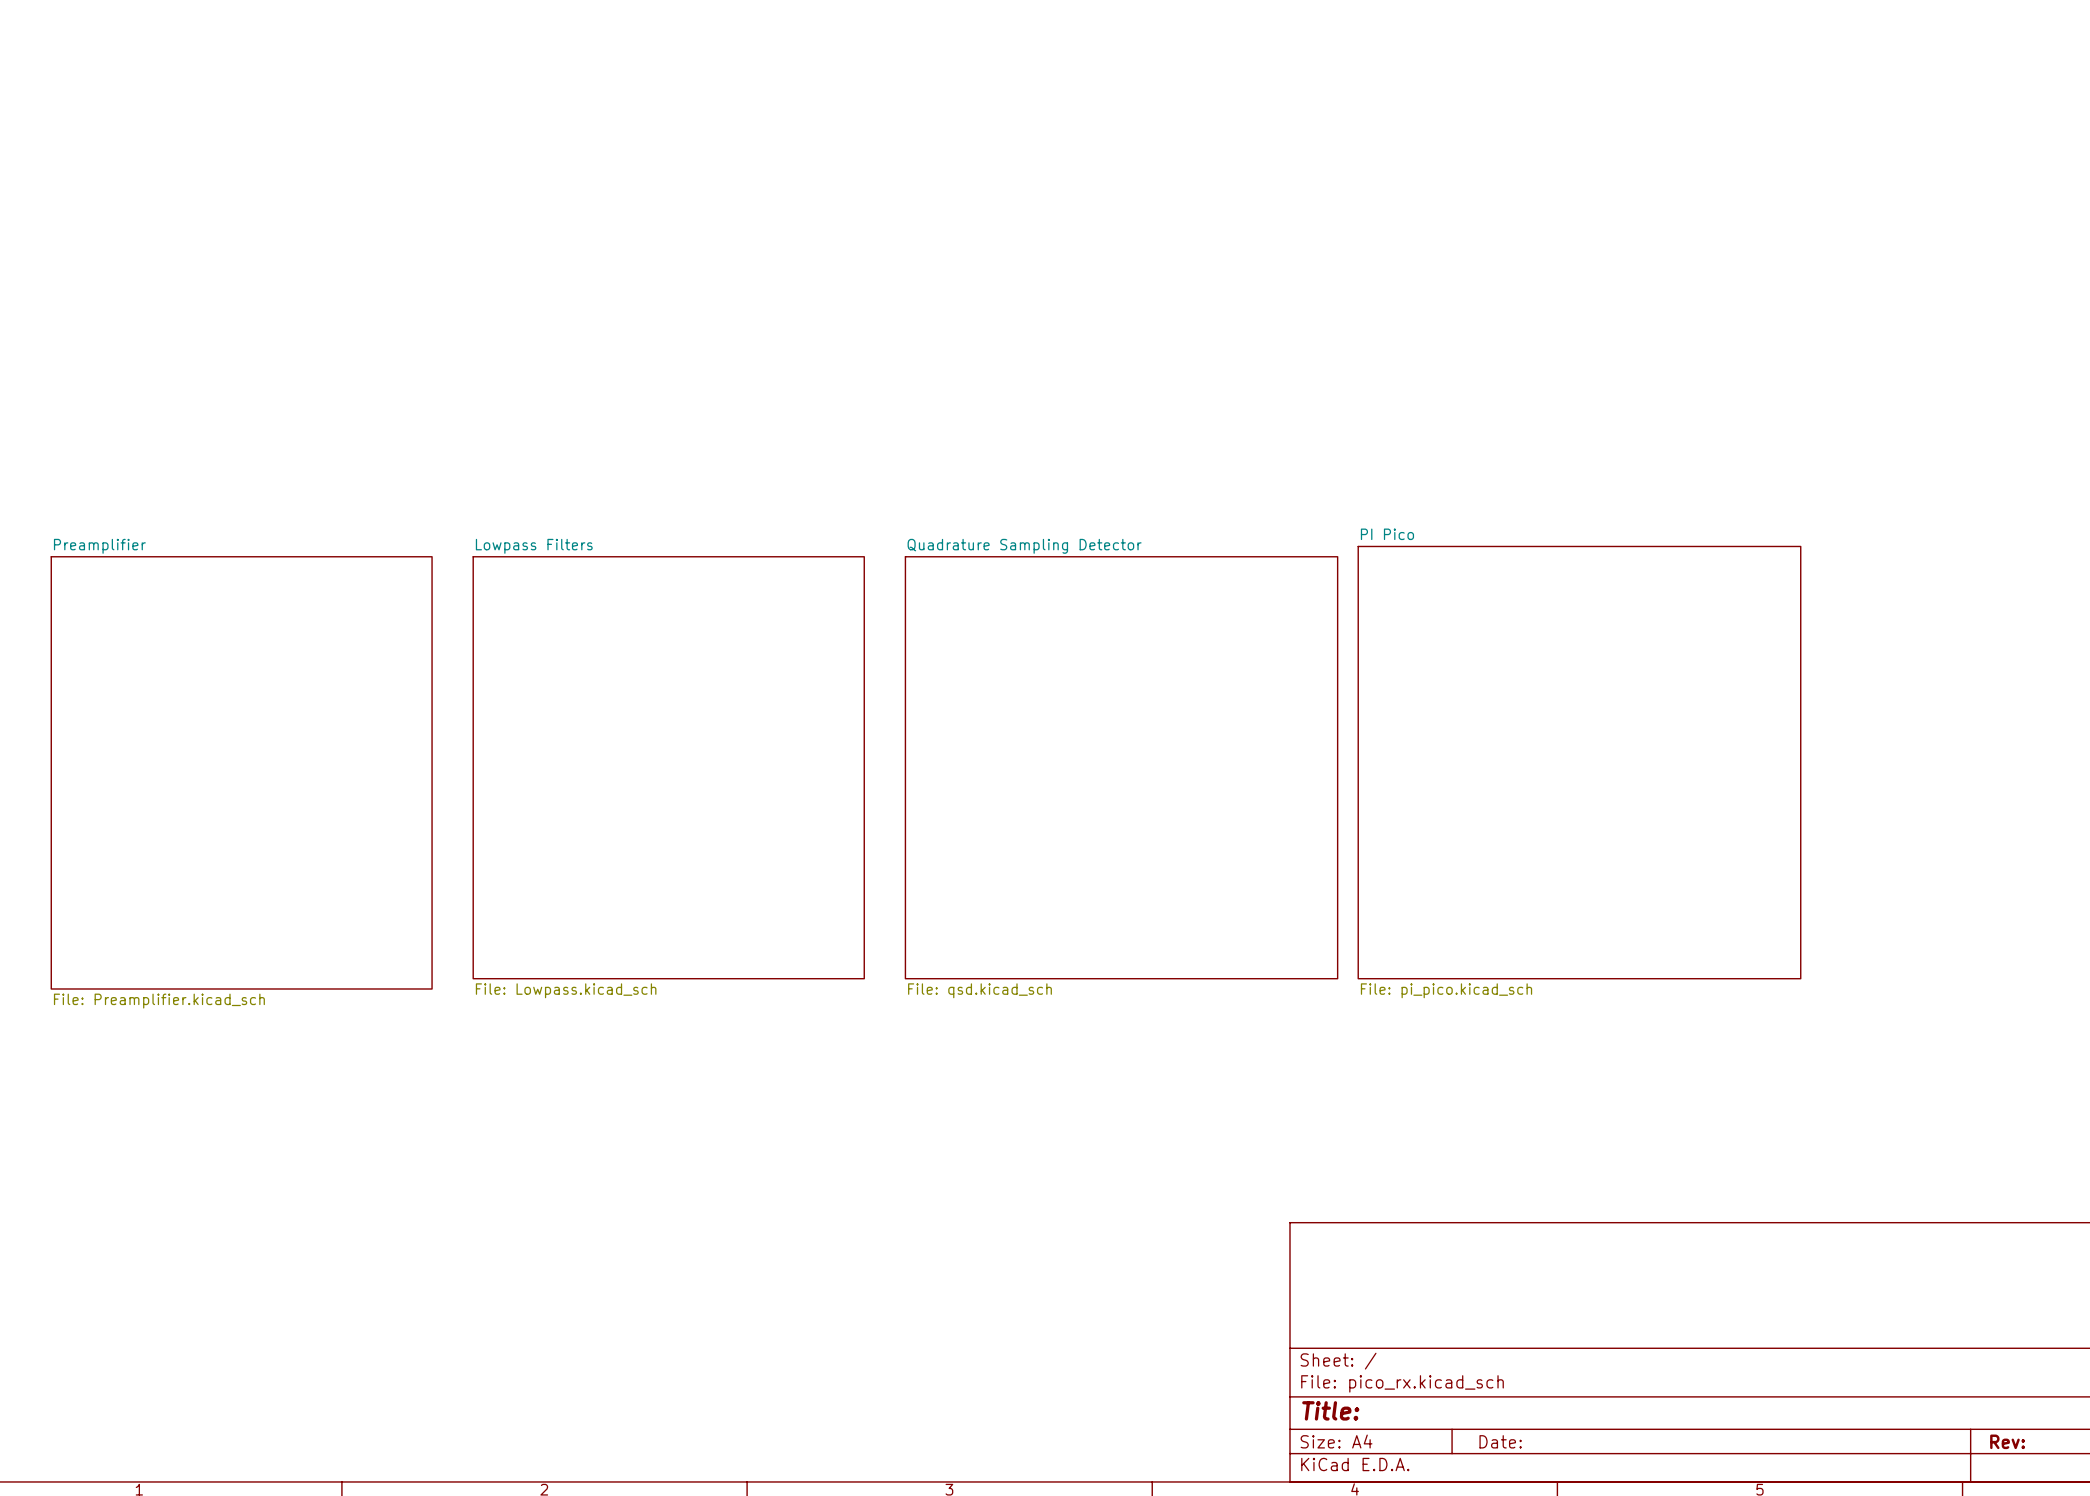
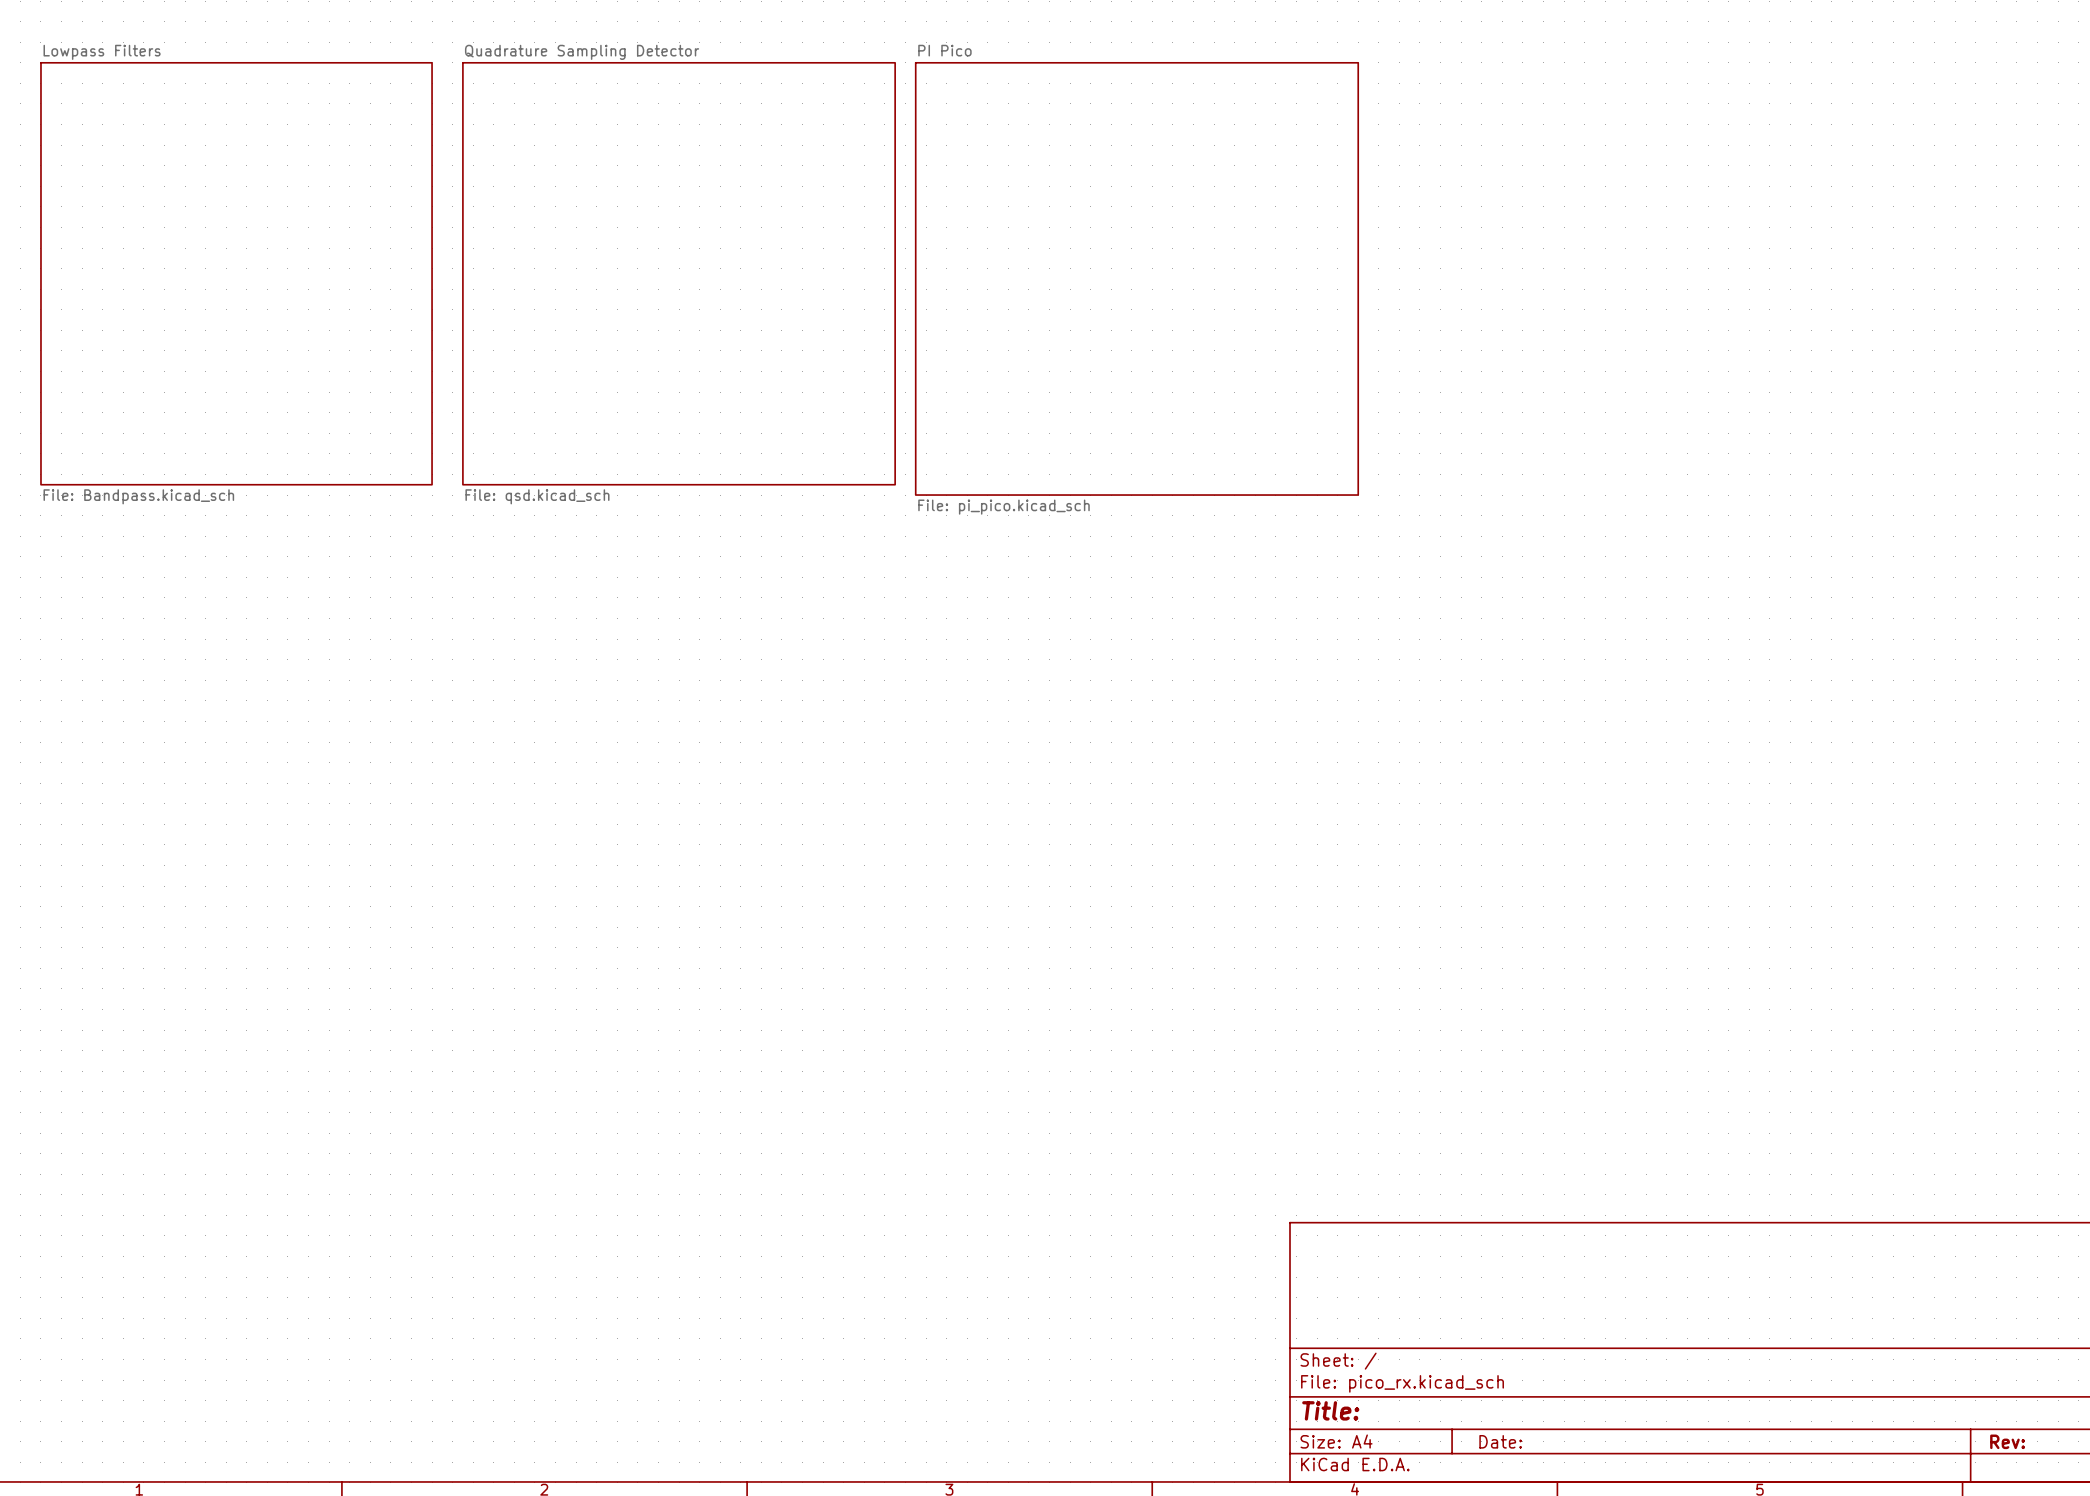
sheet Lowpass Filters: none -> File: Bandpass.kicad_sch (236, 273)
sheet Quadrature Sampling Detector: none -> File: qsd.kicad_sch (679, 273)
sheet PI Pico: none -> File: pi_pico.kicad_sch (1136, 278)
sheet PI Pico: File: pi_pico.kicad_sch (1579, 762) -> none
sheet Lowpass Filters: File: Lowpass.kicad_sch (668, 767) -> none
sheet Quadrature Sampling Detector: File: qsd.kicad_sch (1121, 767) -> none
sheet Preamplifier: File: Preamplifier.kicad_sch (241, 772) -> none

